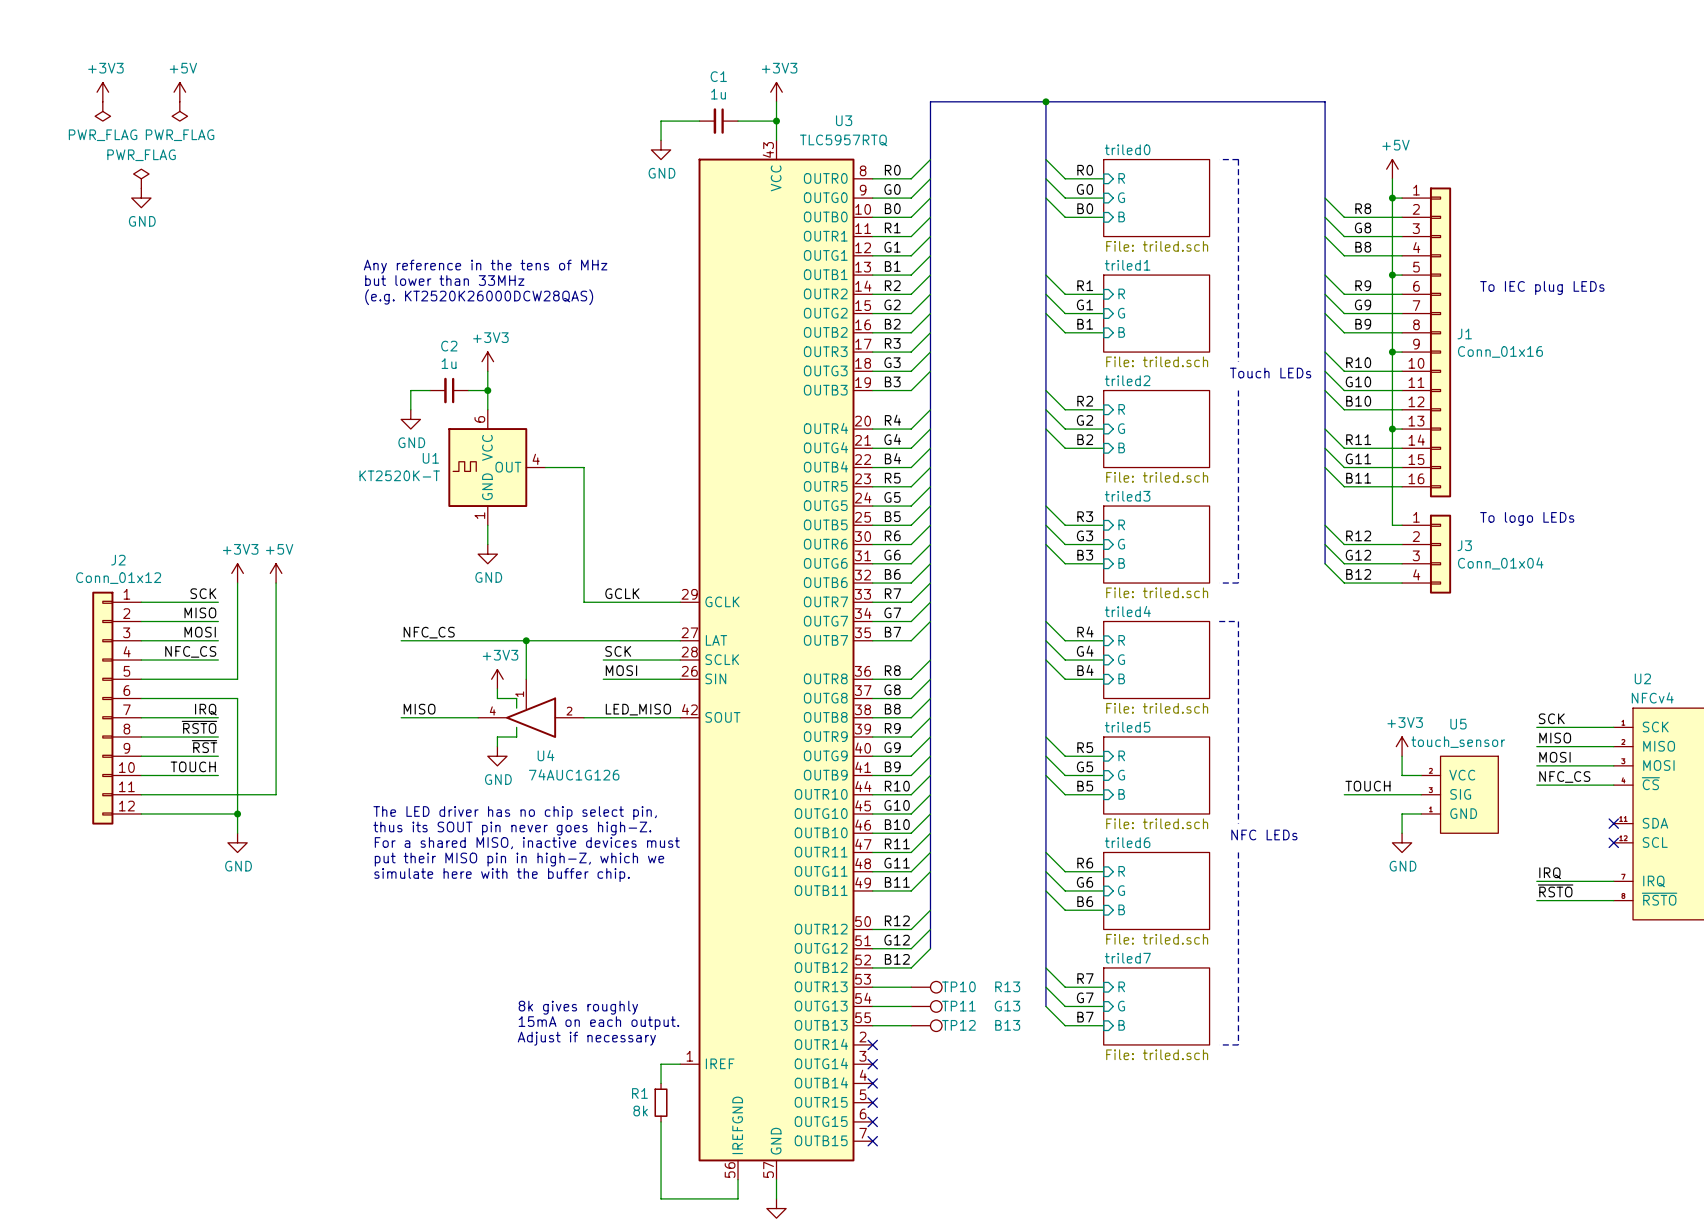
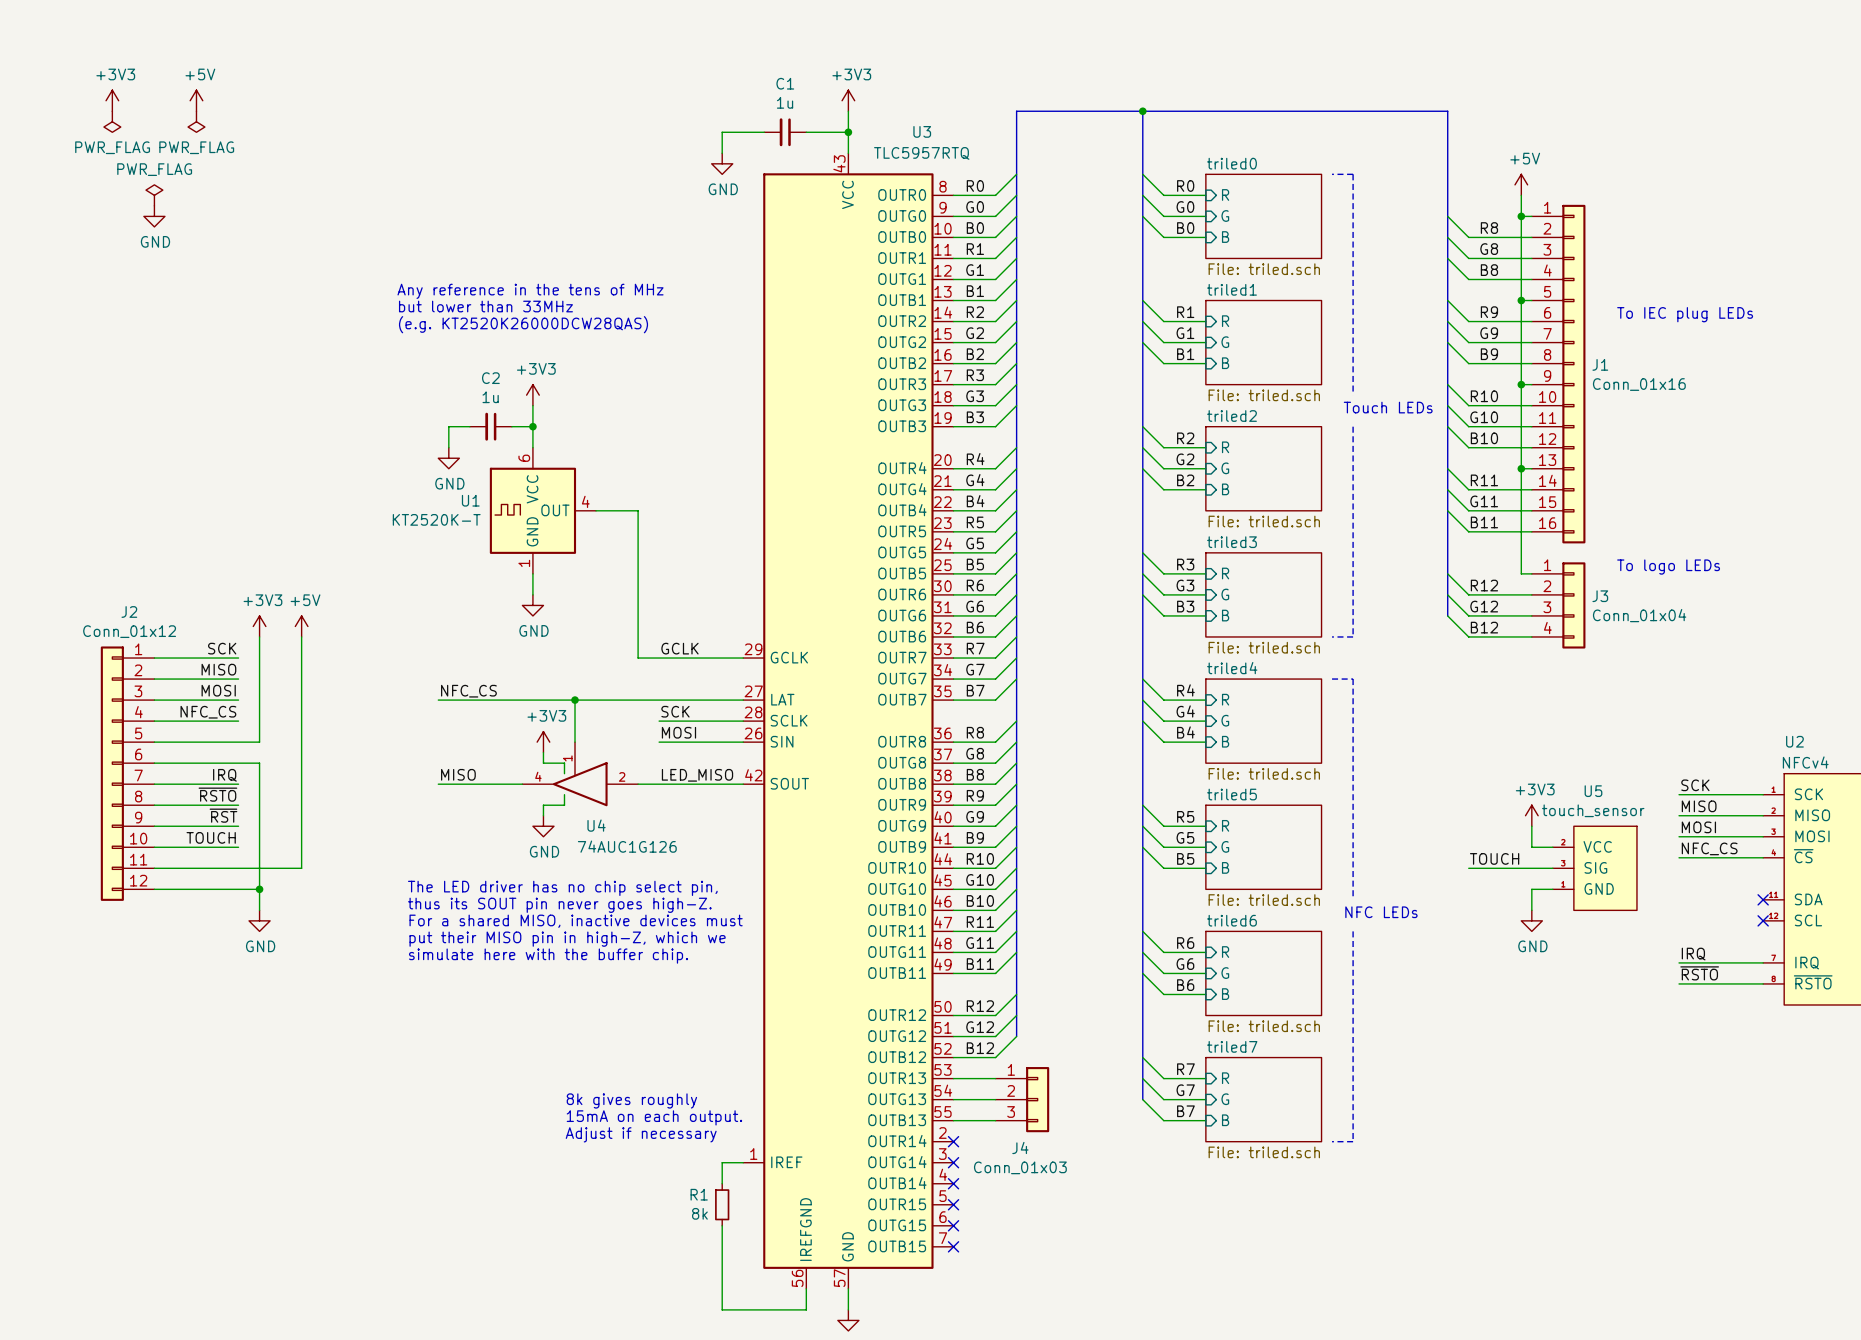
TP10: R13 (926, 987) -> none
TP11: G13 (926, 1006) -> none
J4: none -> Conn_01x03 (1022, 1099)
TP12: B13 (926, 1025) -> none

